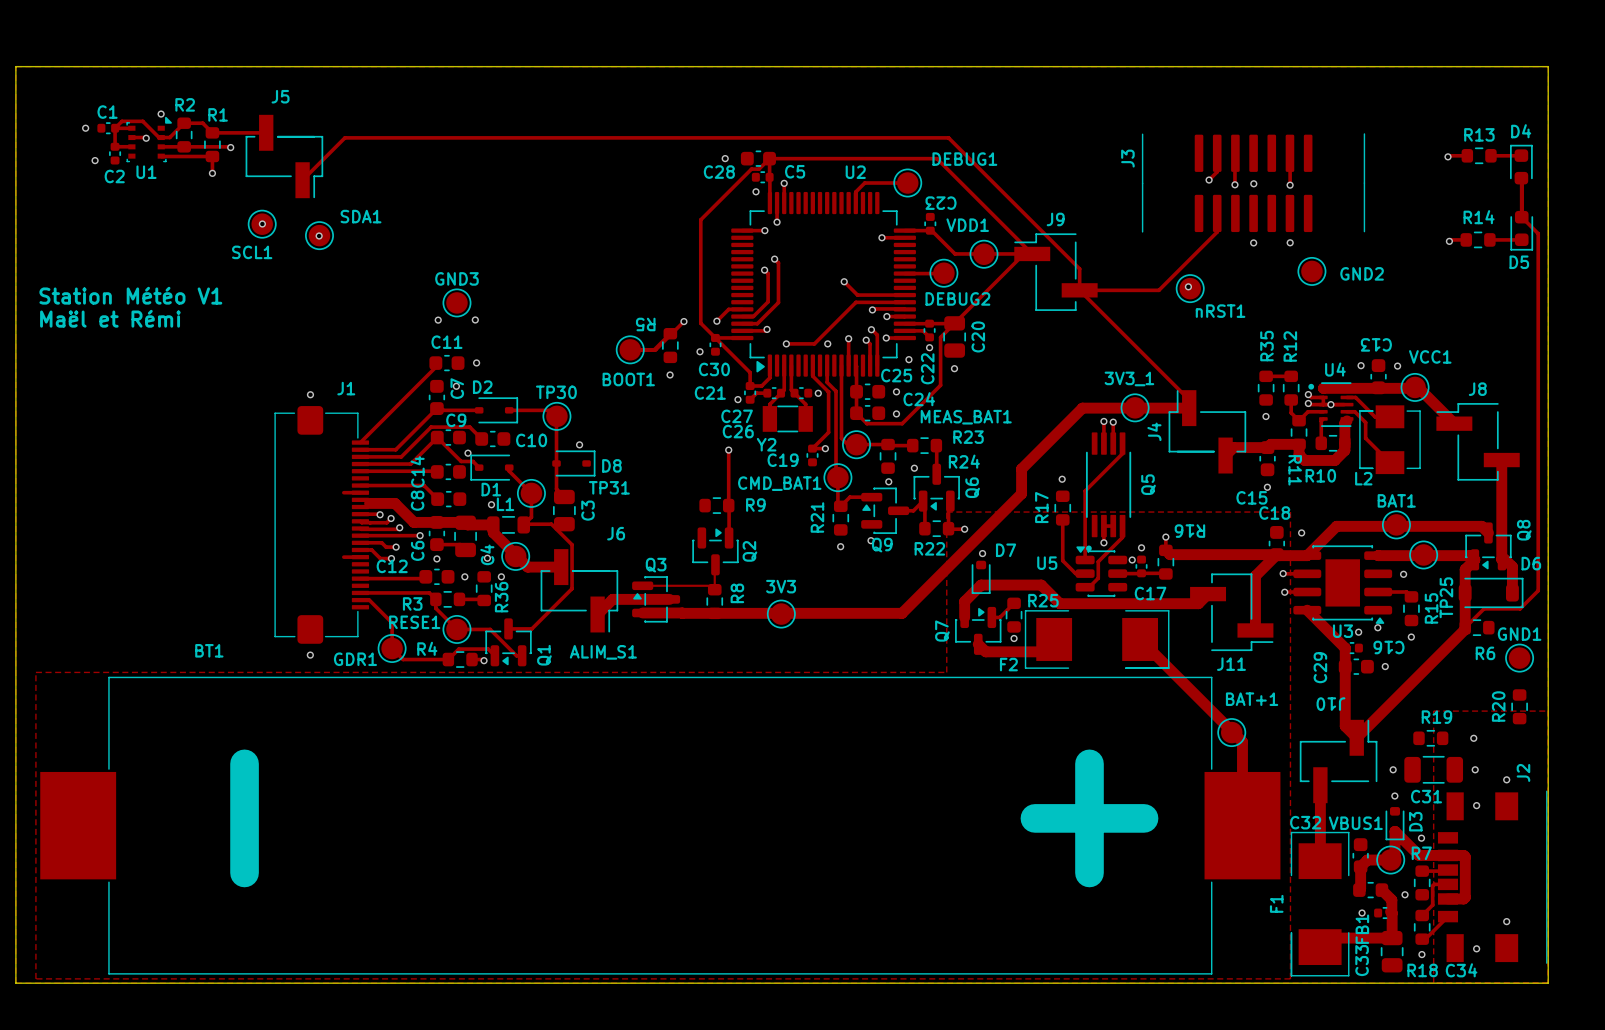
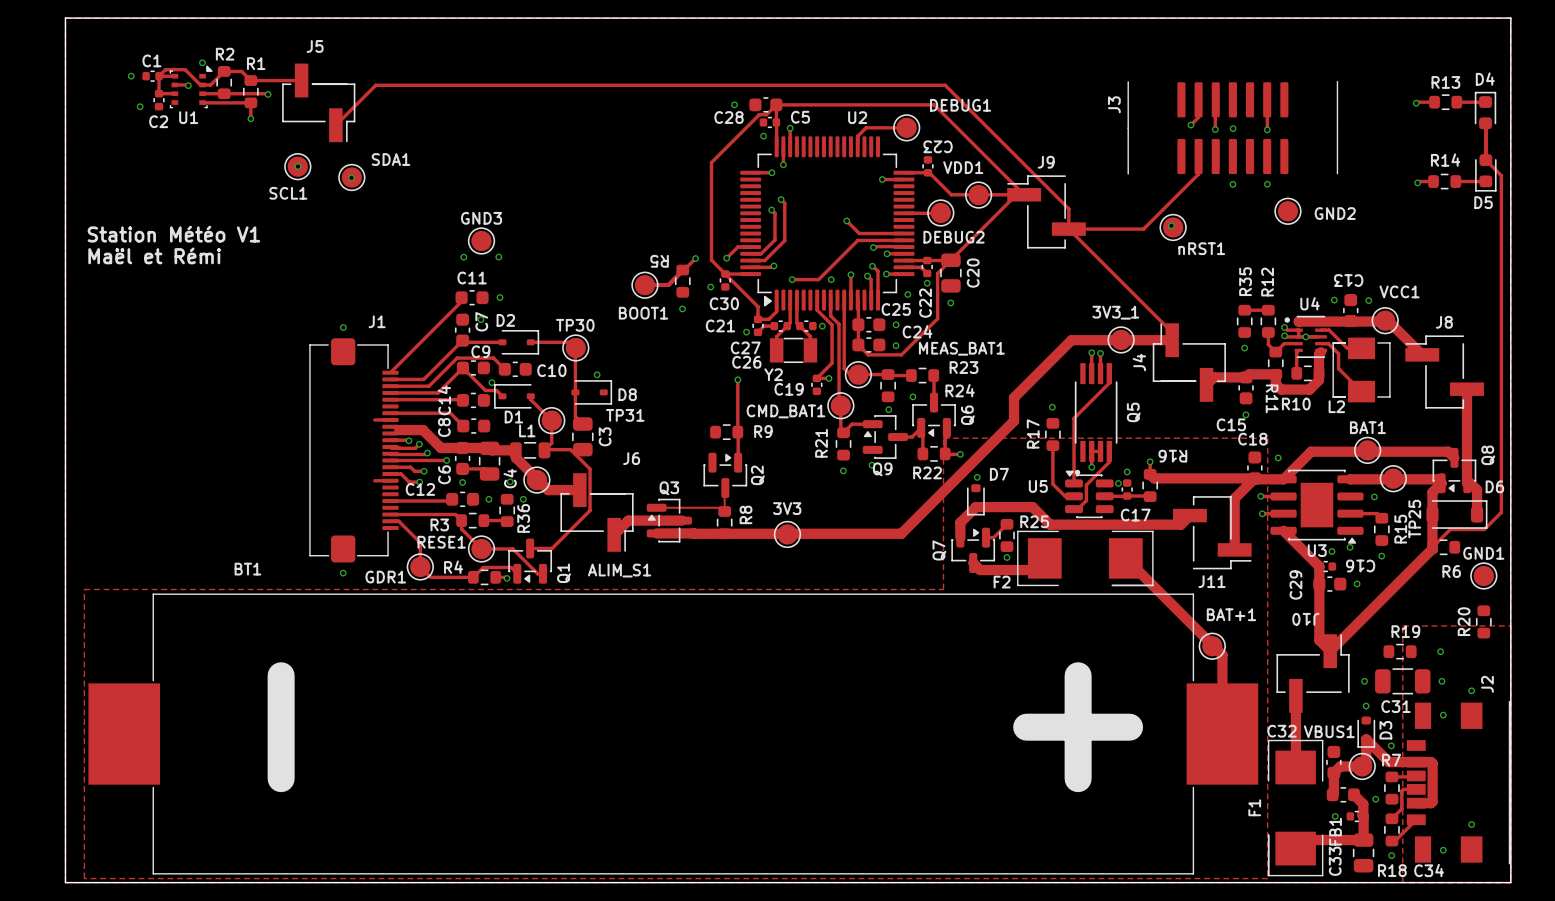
via: (491, 504) -> none

